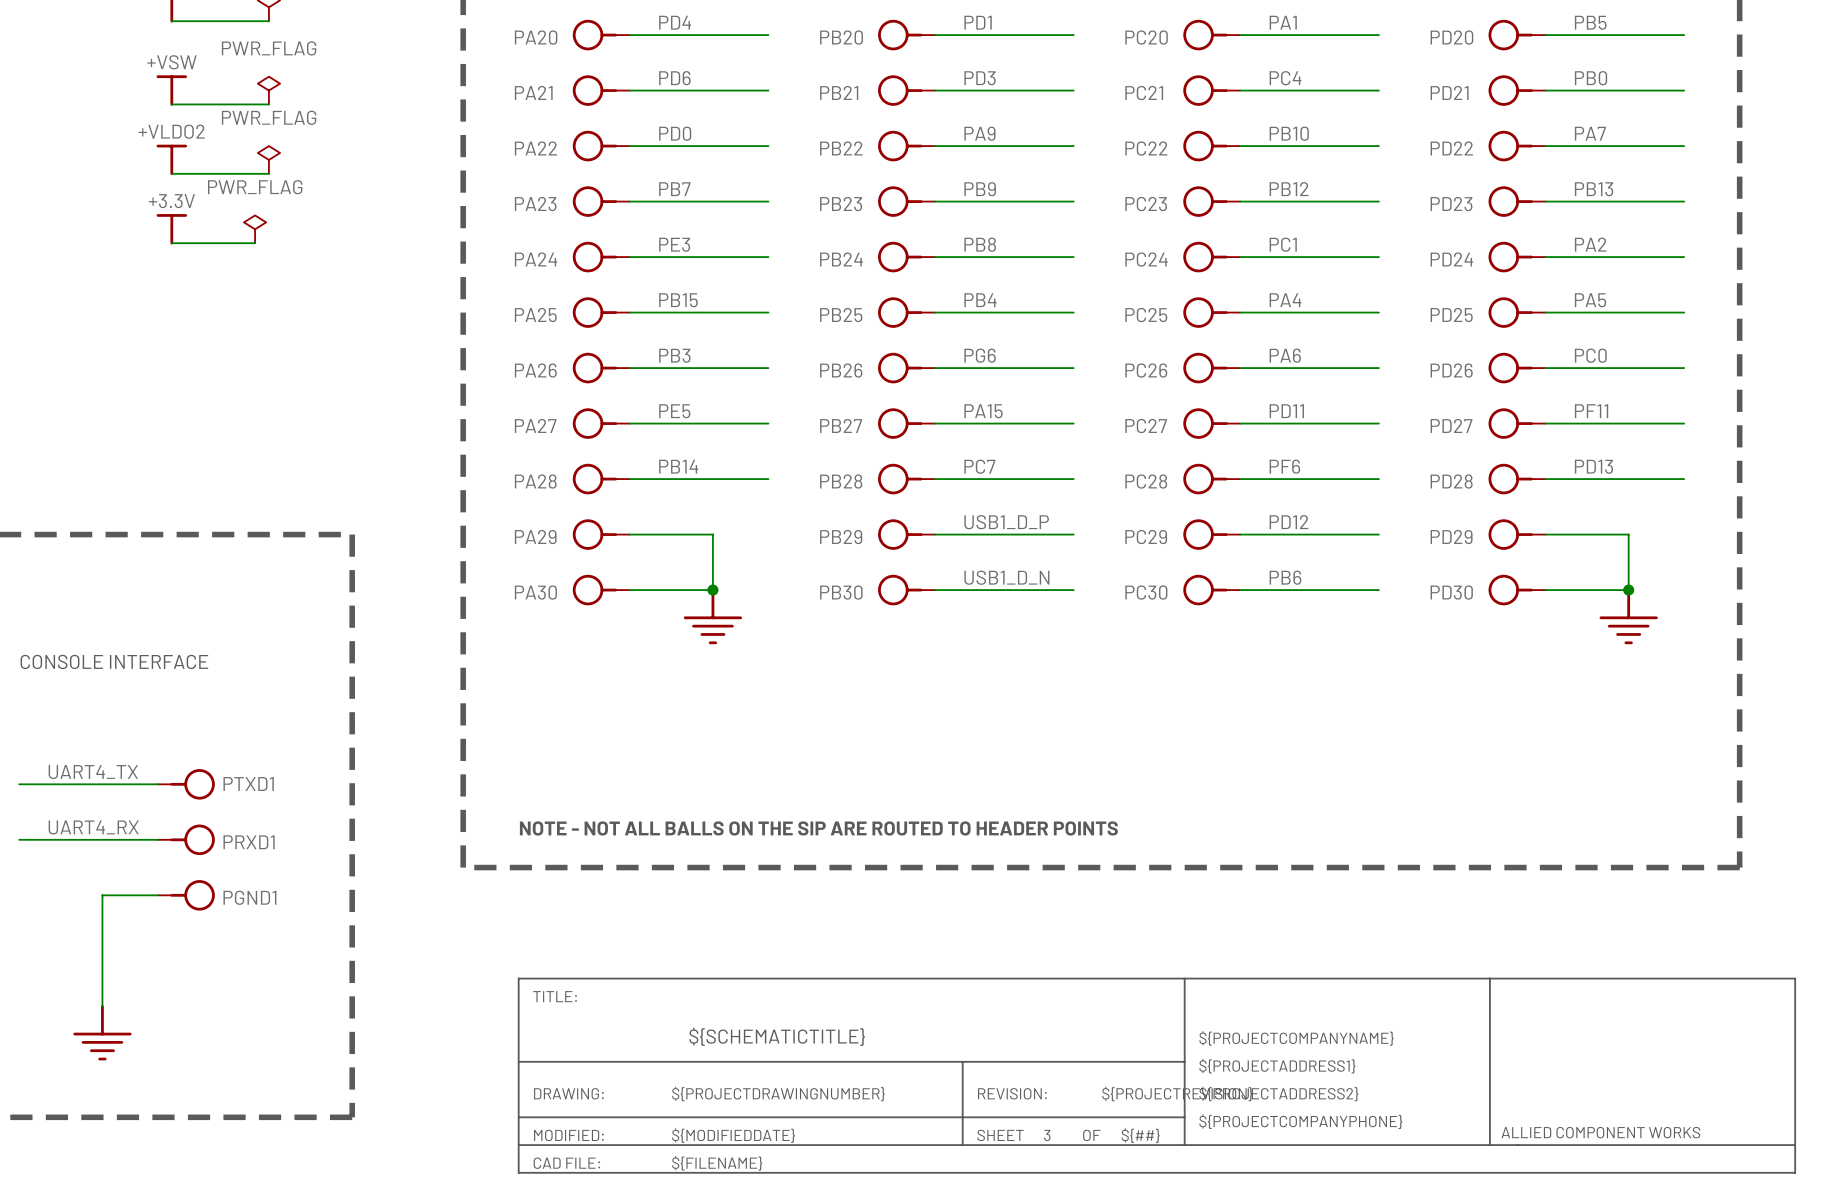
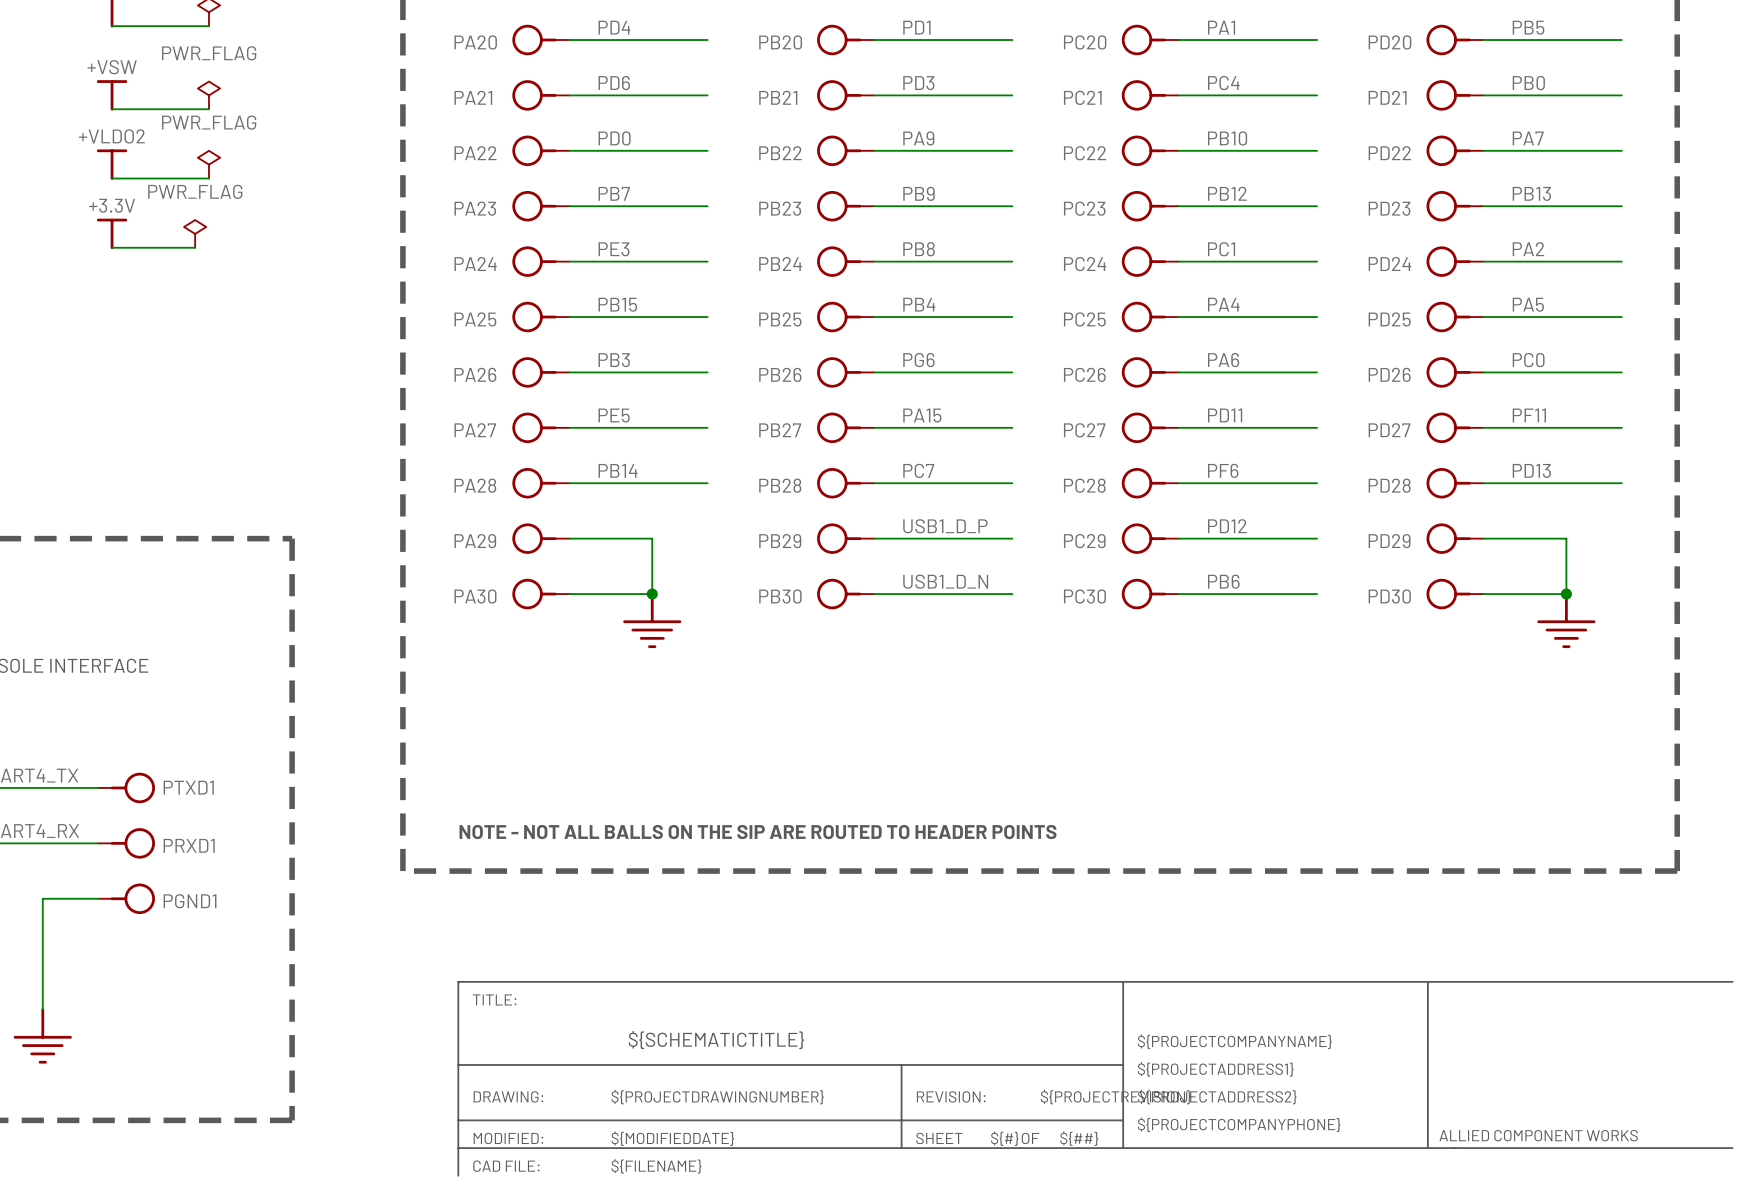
line: (1795, 978) (1795, 1172) (518, 1172) -> none
text: 3 (1047, 1135) -> ${#} (1004, 1138)

